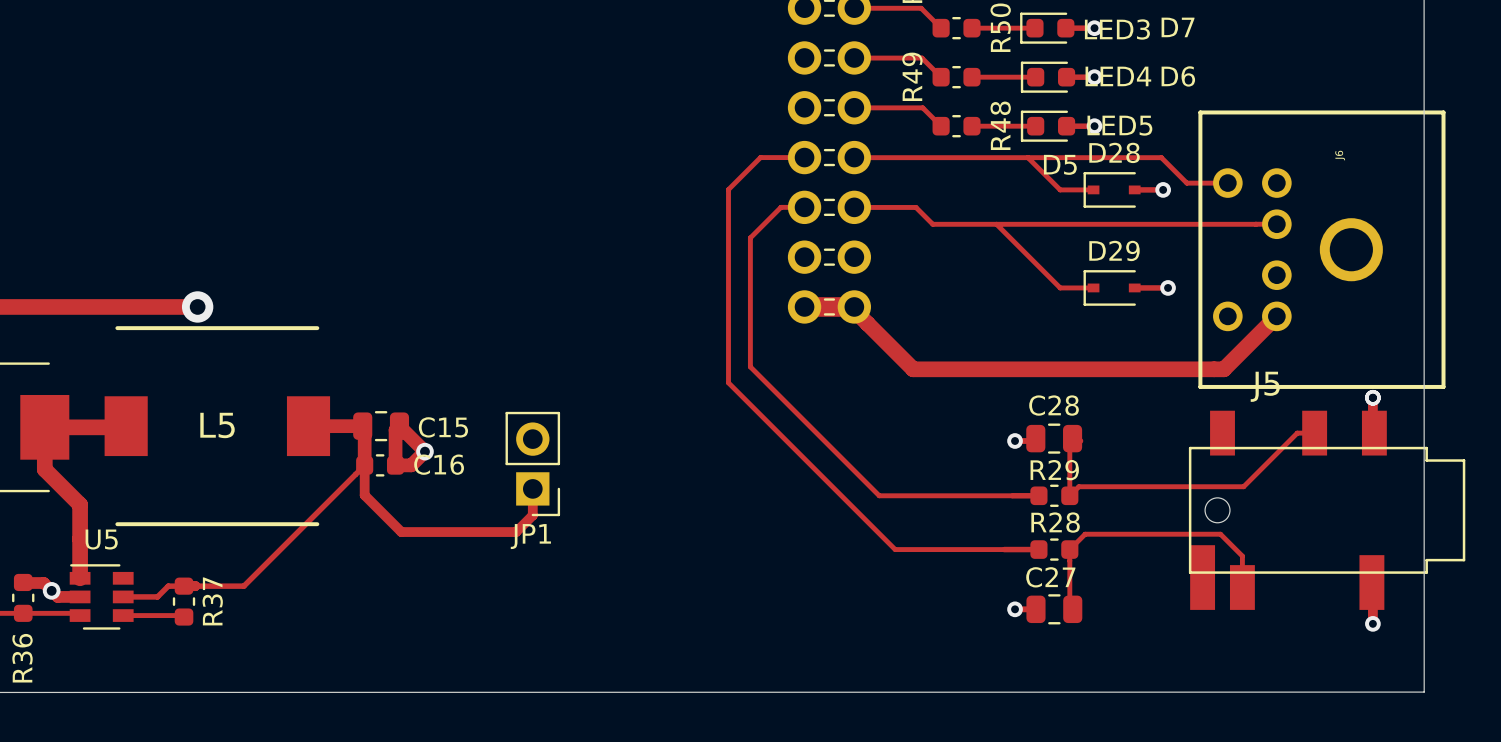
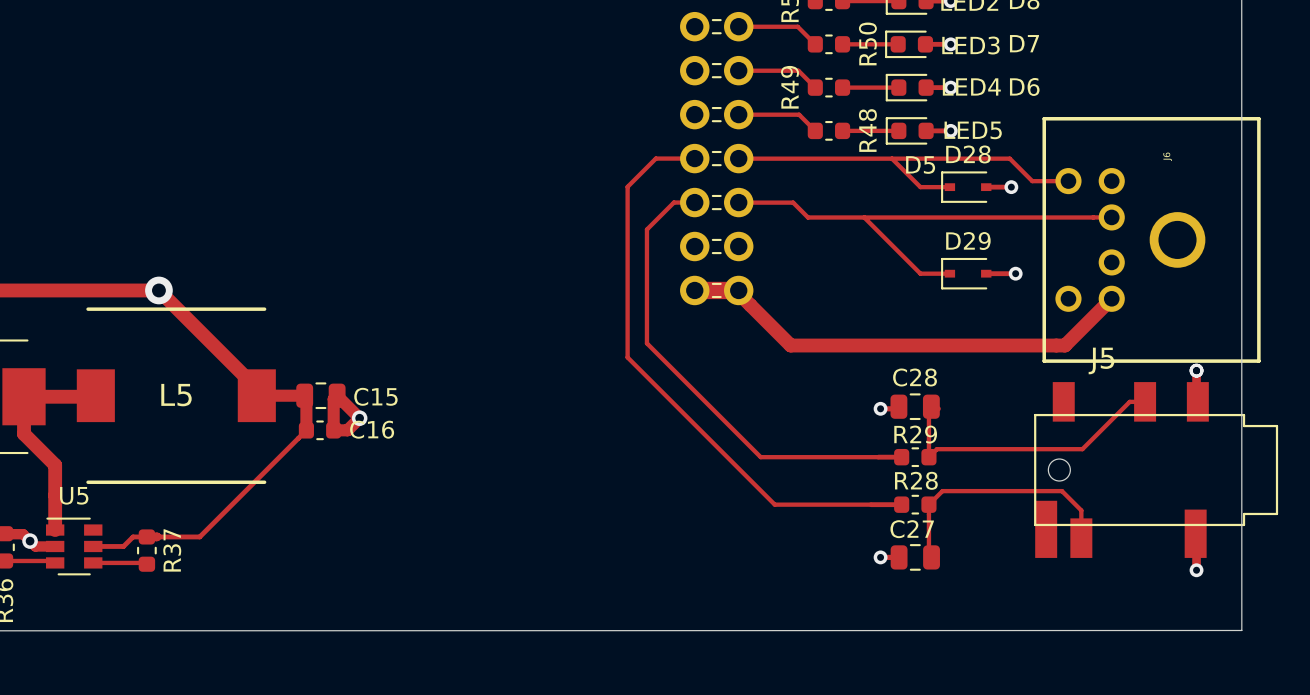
track: none -> (158, 290) (256, 388)
JP1: (532, 464) -> none
track: (364, 465) (364, 495) (401, 532) (516, 532) (532, 515) (532, 488) -> none

